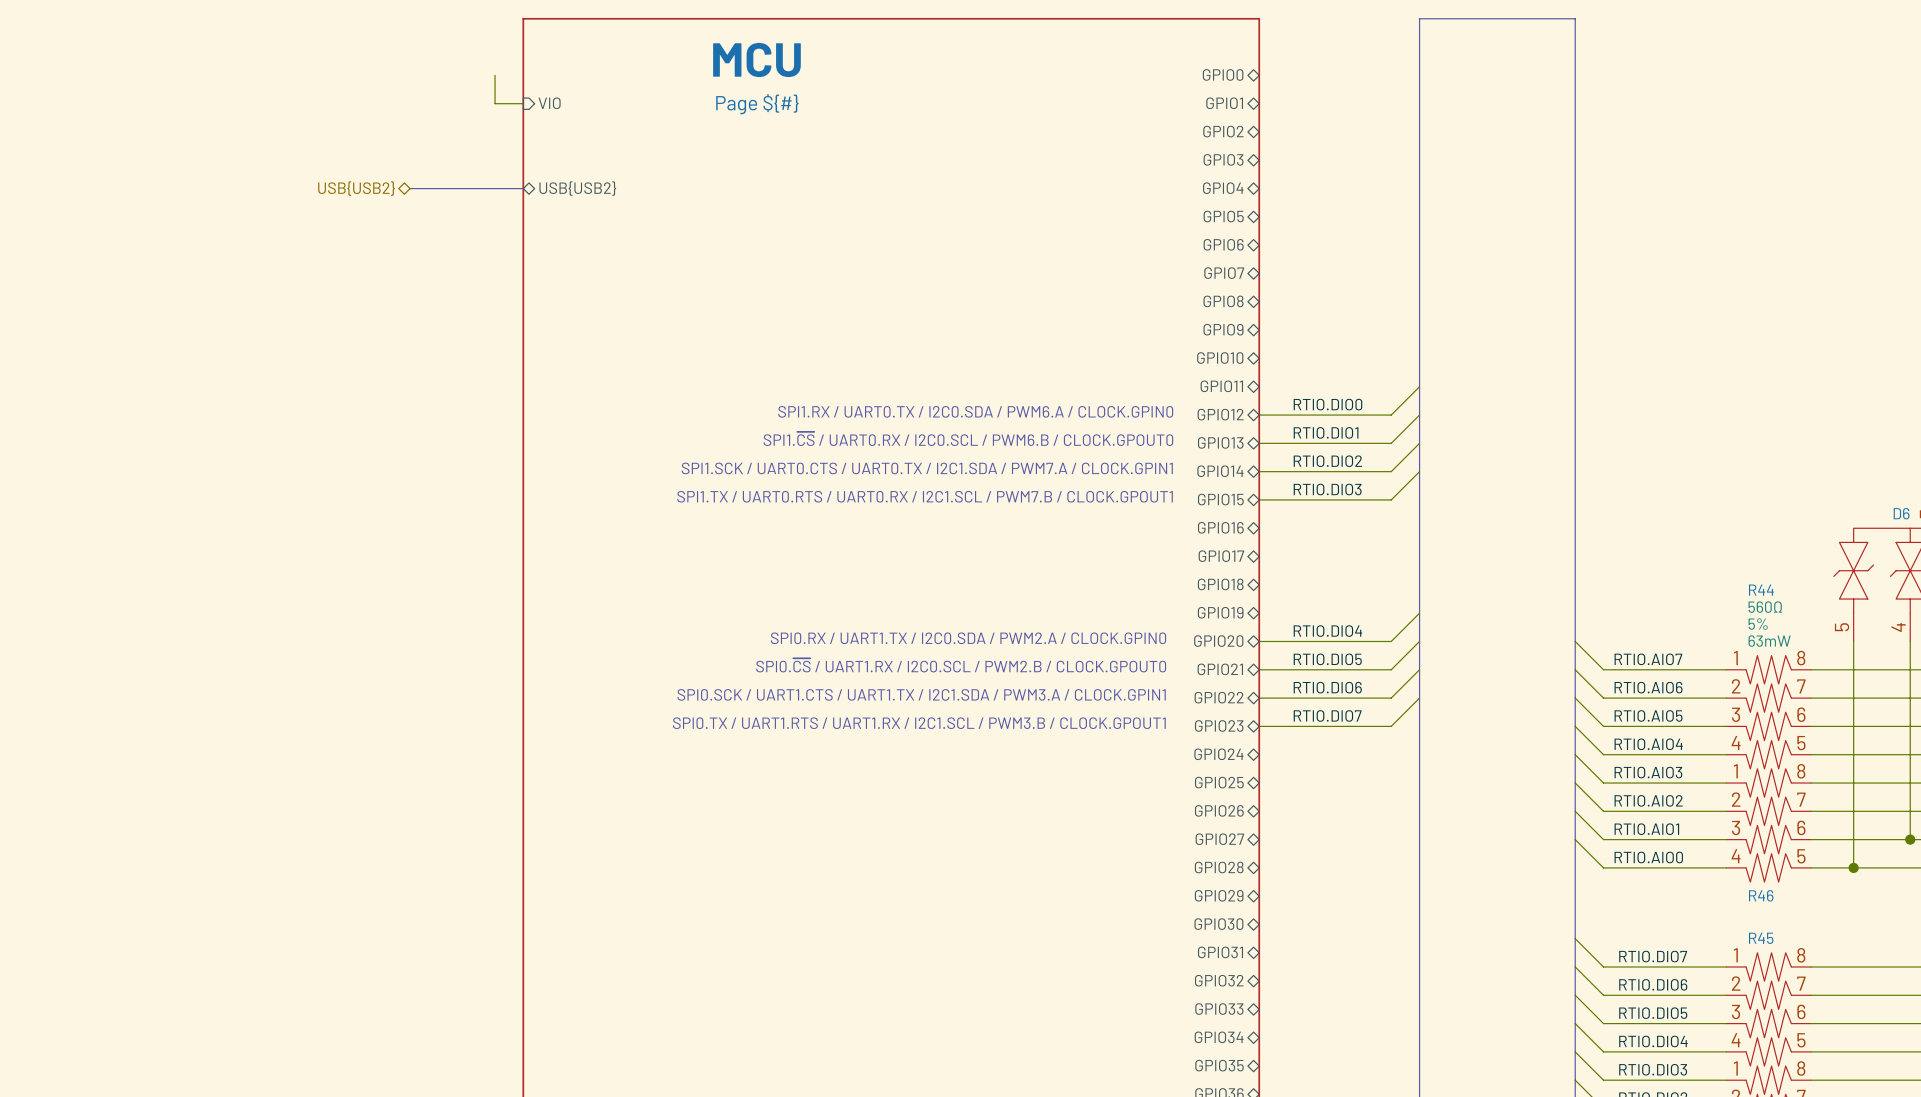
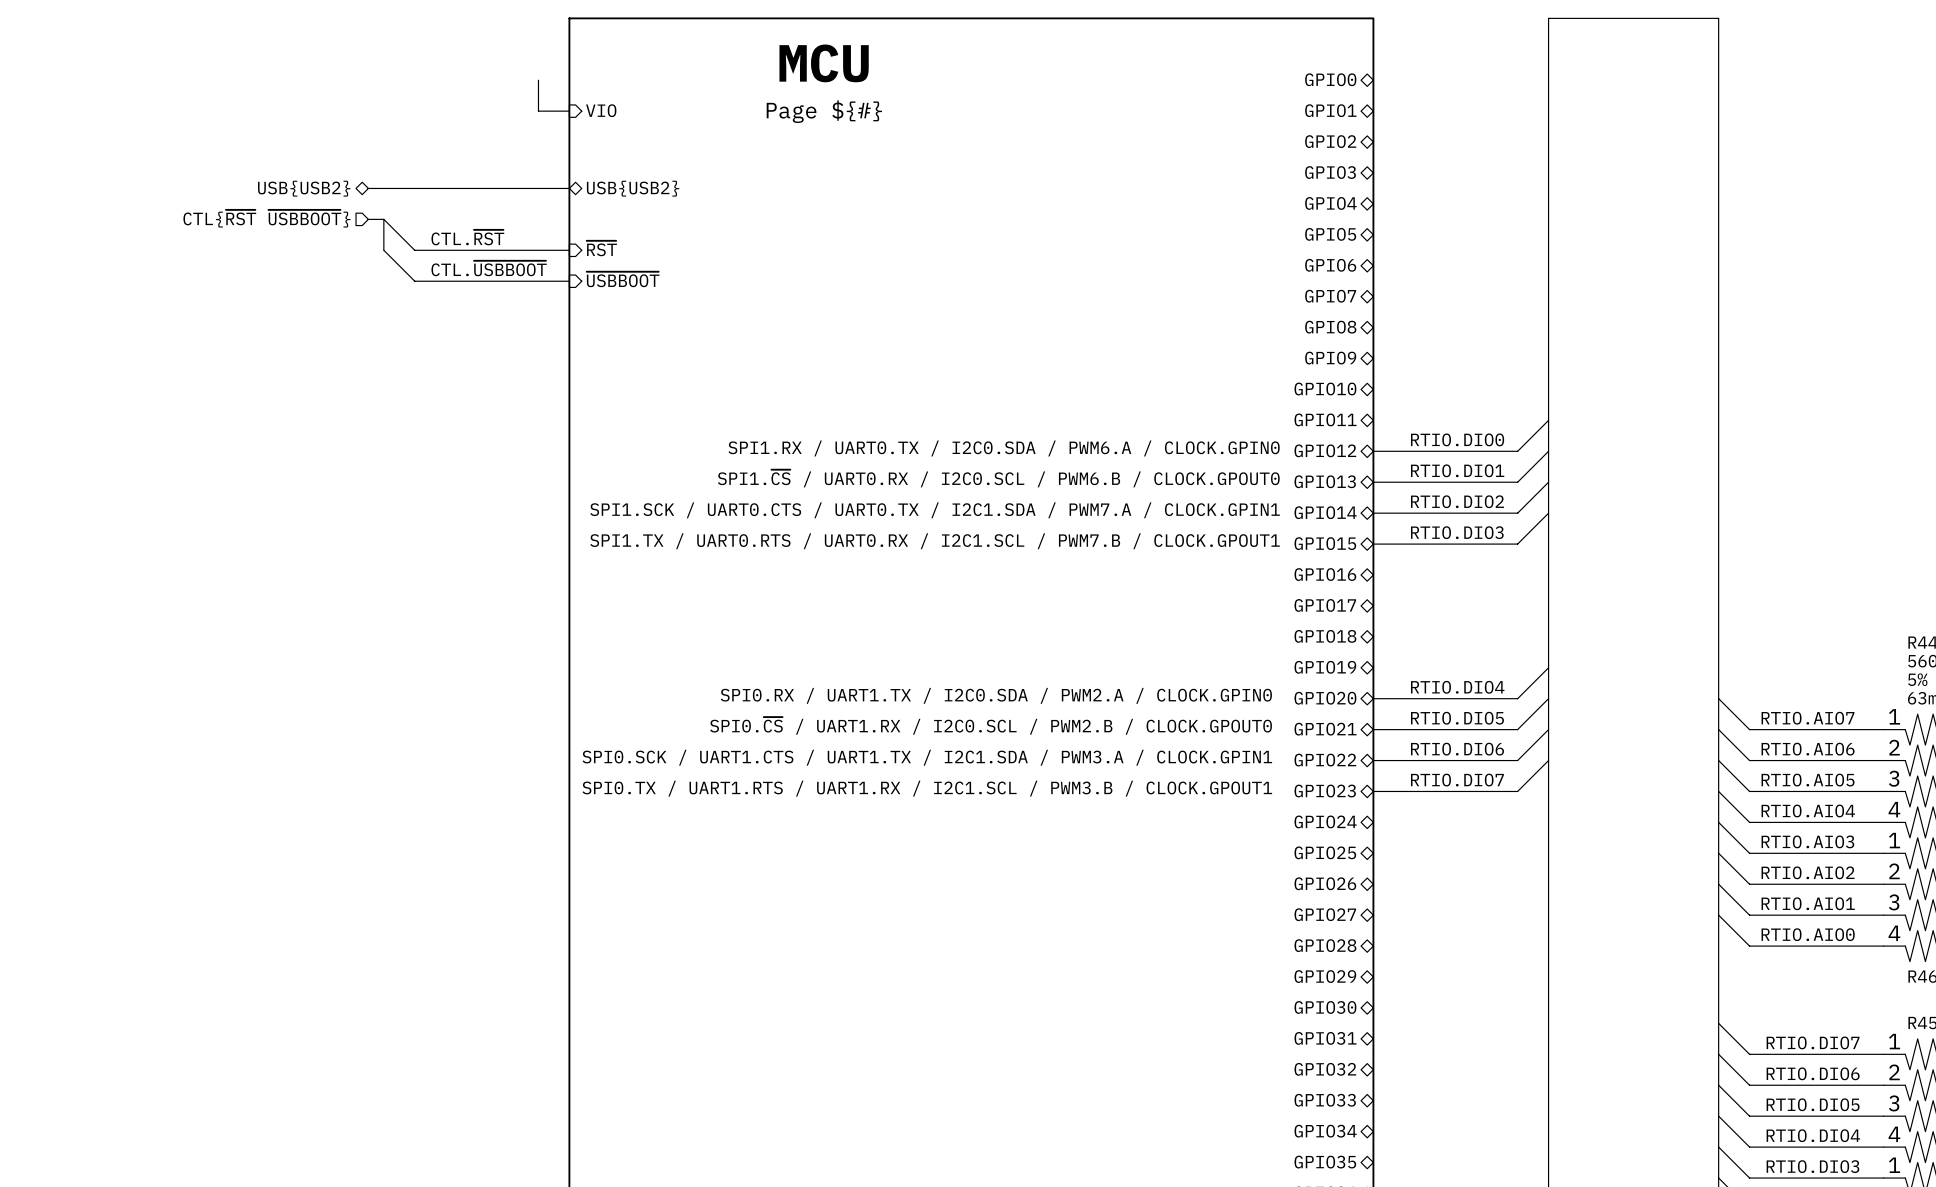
bus: none -> (368, 188) (569, 188)
hierarchical label position: USB{USB2} (356, 188) -> USB{USB2} (304, 188)
bus: (410, 188) (523, 188) -> none
sheet pin position: USB{USB2} (577, 188) -> USB{USB2} (633, 188)
hierarchical label: none -> CTL{~{RST} ~{USBBOOT}} (266, 218)
bus: none -> (368, 219) (383, 219) (383, 250)
wire: none -> (383, 219) (414, 250) (569, 250)
label: none -> CTL.~{RST} (467, 237)
sheet pin: none -> ~{RST} (601, 248)
wire: none -> (383, 250) (414, 281) (569, 281)
label: none -> CTL.~{USBBOOT} (489, 268)
sheet pin: none -> ~{USBBOOT} (623, 279)

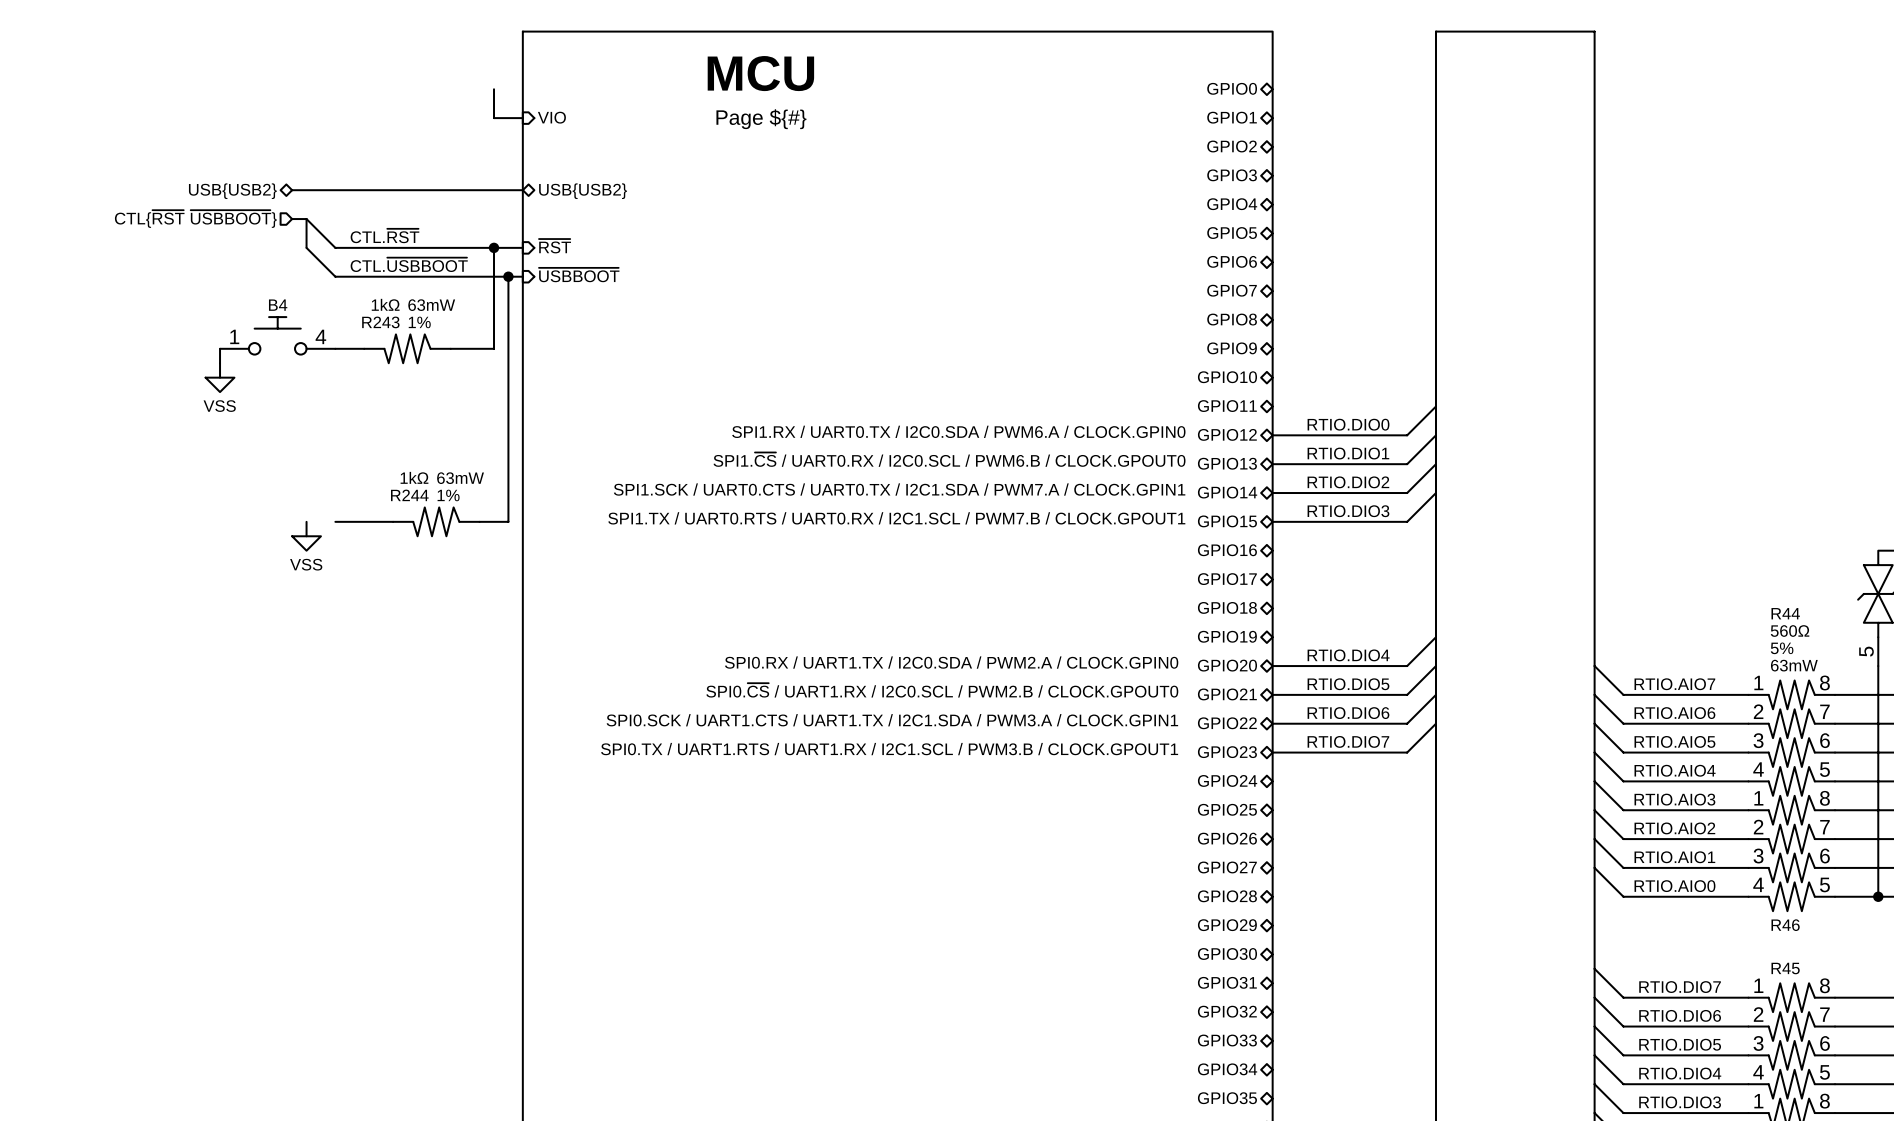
hierarchical label position: USB{USB2} (304, 188) -> USB{USB2} (232, 191)
bus: none -> (292, 190) (335, 190)
hierarchical label position: CTL{~{RST} ~{USBBOOT}} (266, 218) -> CTL{~{RST} ~{USBBOOT}} (195, 219)
bus: (368, 219) (383, 219) (383, 250) -> (292, 219) (306, 219) (306, 247)
wire: (383, 219) (414, 250) -> (306, 219) (335, 247) (378, 247)
label position: CTL.~{RST} (467, 237) -> CTL.~{RST} (384, 235)
wire: (383, 250) (414, 281) -> (306, 247) (335, 276) (378, 276)
wire: none -> (494, 247) (494, 348) (450, 348)
junction: none -> (494, 247)
label position: CTL.~{USBBOOT} (489, 268) -> CTL.~{USBBOOT} (409, 264)
wire: none -> (508, 276) (508, 521) (479, 521)
junction: none -> (508, 276)
B4: none -> (277, 335)
wire: none -> (220, 348) (220, 363)
wire: none -> (335, 348) (364, 348)
R243: none -> (407, 348)
power symbol: none -> VSS (220, 377)
wire: none -> (335, 521) (393, 521)
R244: none -> (436, 521)
power symbol: none -> VSS (306, 536)

